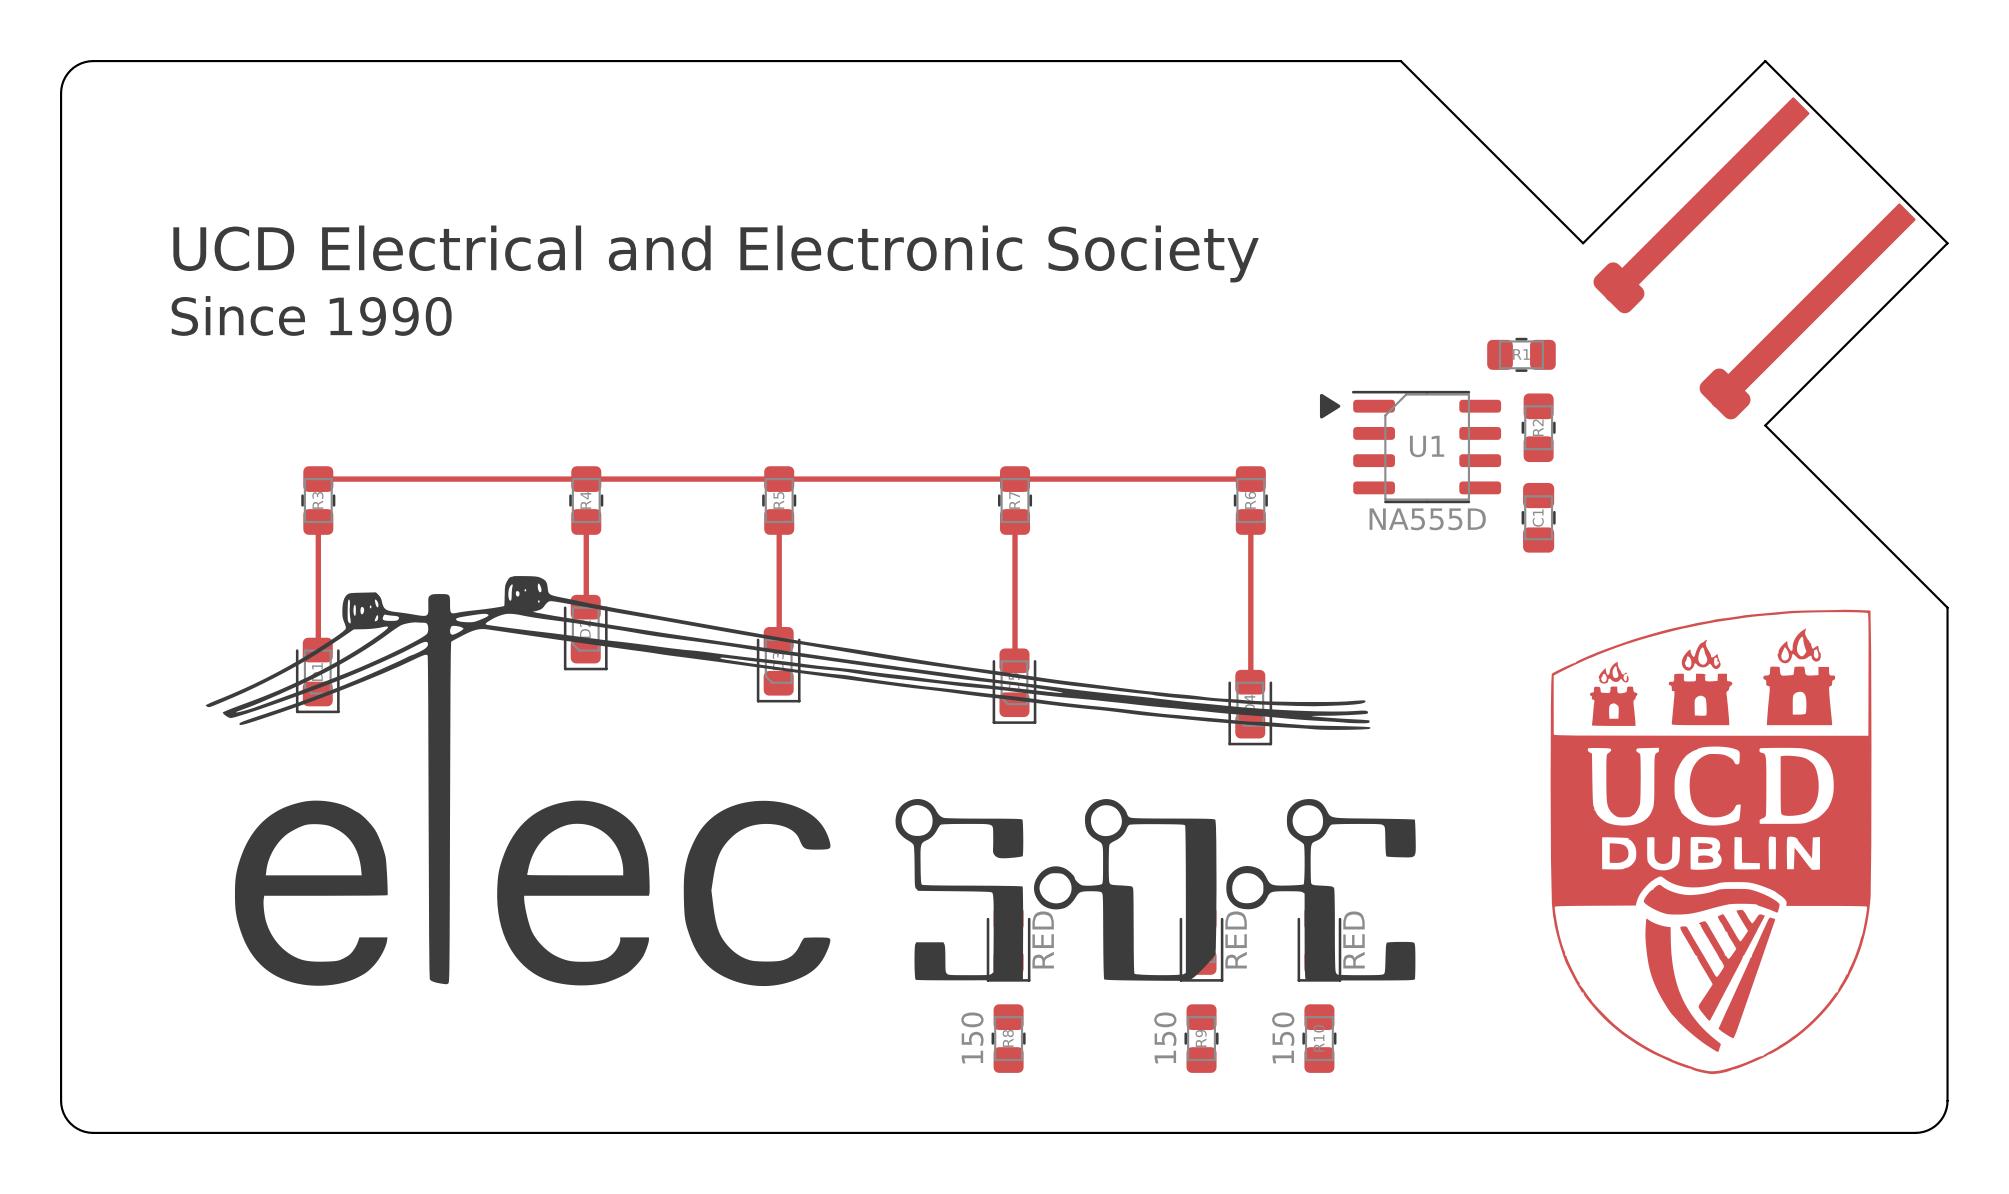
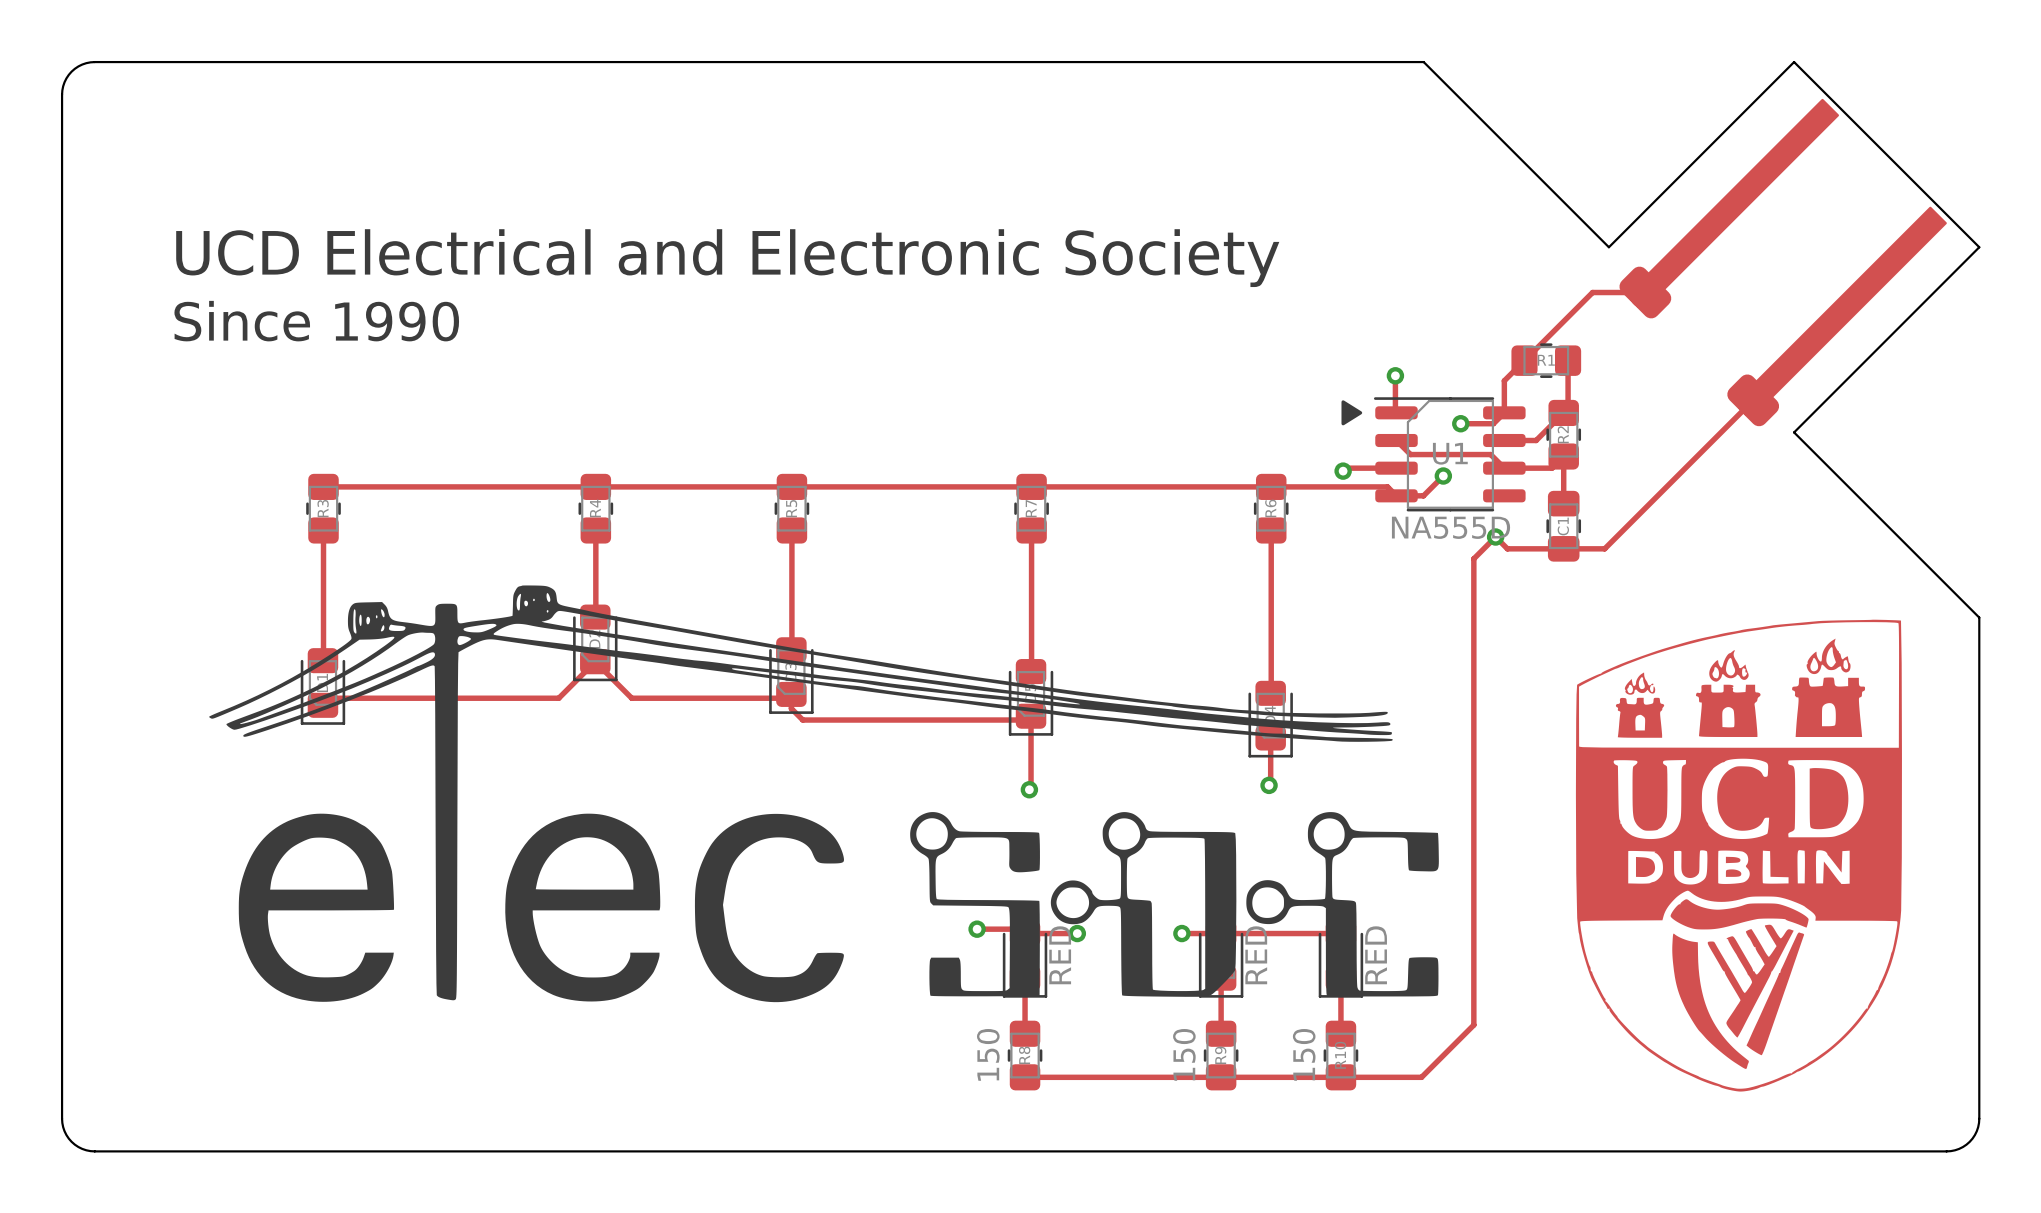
track: none -> (1645, 292) (1592, 292) (1504, 380) (1504, 412) (1493, 423) (1460, 423)
track: none -> (1568, 360) (1568, 408) (1536, 440) (1504, 440)
track: none -> (1395, 375) (1396, 412)
via: none -> (1395, 375)
track: none -> (1753, 400) (1604, 548) (1507, 548) (1495, 537) (1473, 558) (1473, 1025) (1421, 1077) (1025, 1077)
via: none -> (1460, 423)
track: none -> (1396, 440) (1410, 454) (1490, 454) (1504, 468) (1552, 468) (1563, 456) (1563, 503)
track: none -> (1396, 468) (1346, 468) (1343, 471)
via: none -> (1343, 471)
track: none -> (1443, 476) (1423, 495) (1396, 495) (1387, 486) (1282, 486)
via: none -> (1443, 476)
via: none -> (1495, 537)
track: none -> (323, 704) (330, 698) (558, 698) (595, 661) (631, 698) (787, 698) (791, 694) (791, 708) (802, 720) (1027, 720)
track: none -> (1025, 722) (1031, 716) (1031, 788) (1029, 789)
track: none -> (1270, 738) (1270, 783) (1269, 785)
via: none -> (1269, 785)
via: none -> (1029, 789)
track: none -> (977, 929) (1020, 929) (1025, 933) (1077, 933)
via: none -> (977, 929)
via: none -> (1077, 933)
track: none -> (1181, 933) (1340, 933)
via: none -> (1181, 933)
track: none -> (1025, 978) (1025, 1033)
track: none -> (1221, 978) (1221, 1033)
track: none -> (1340, 978) (1340, 1033)

